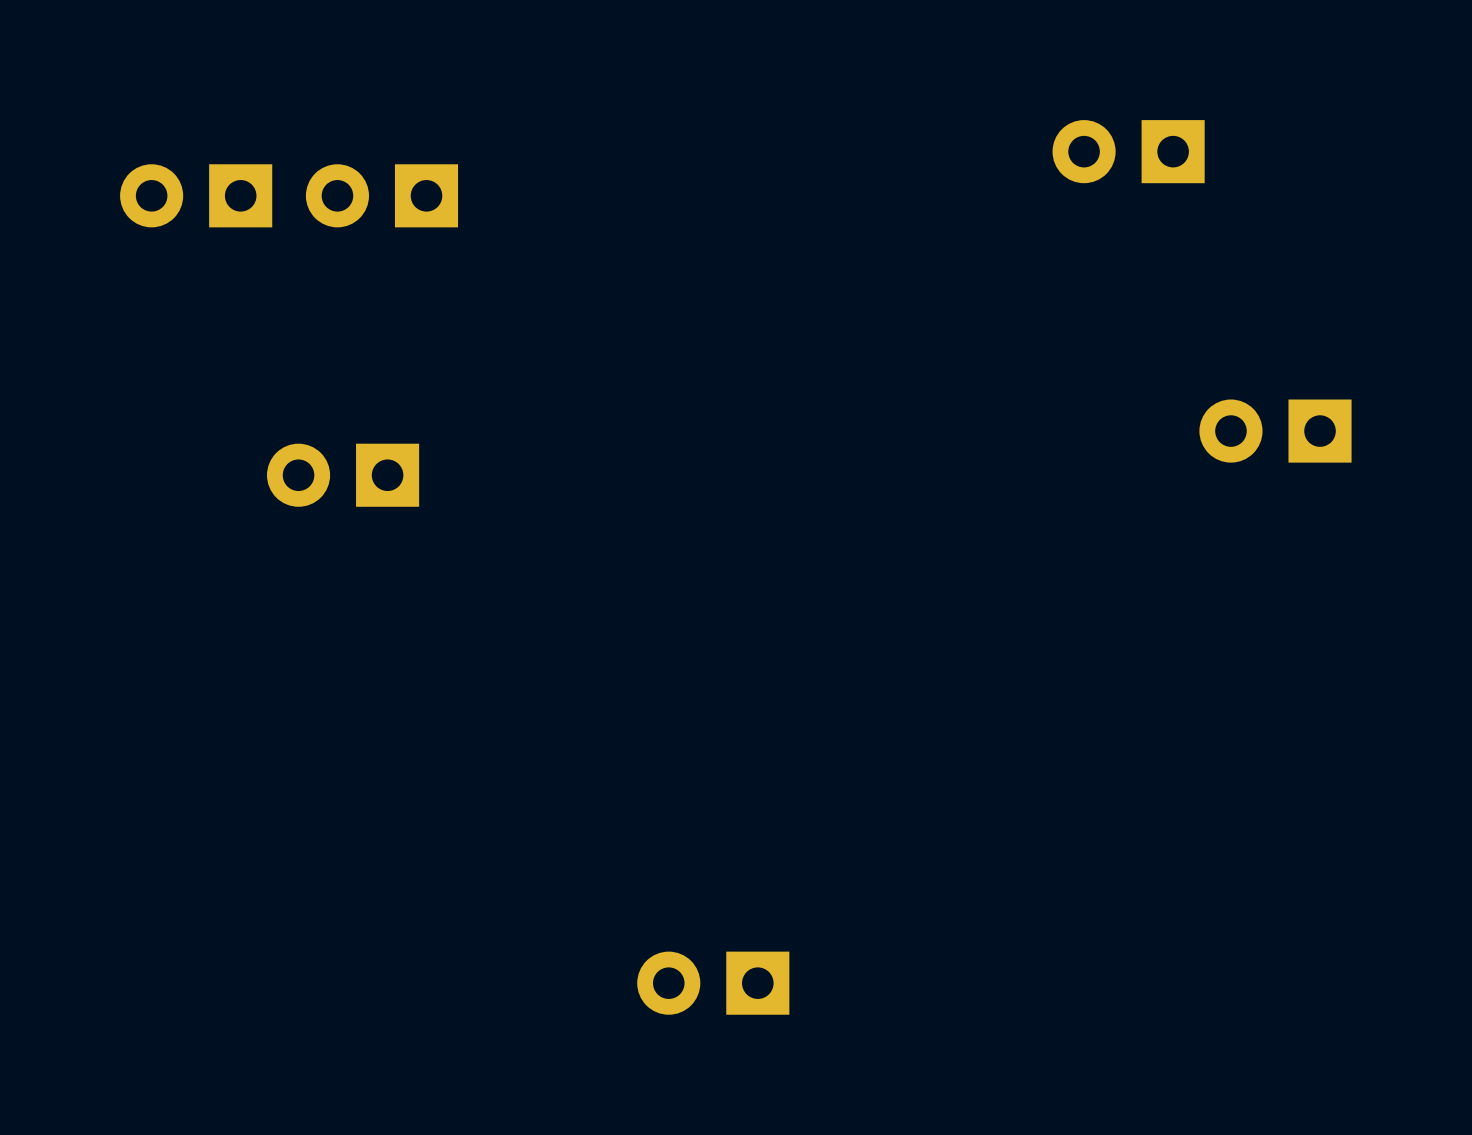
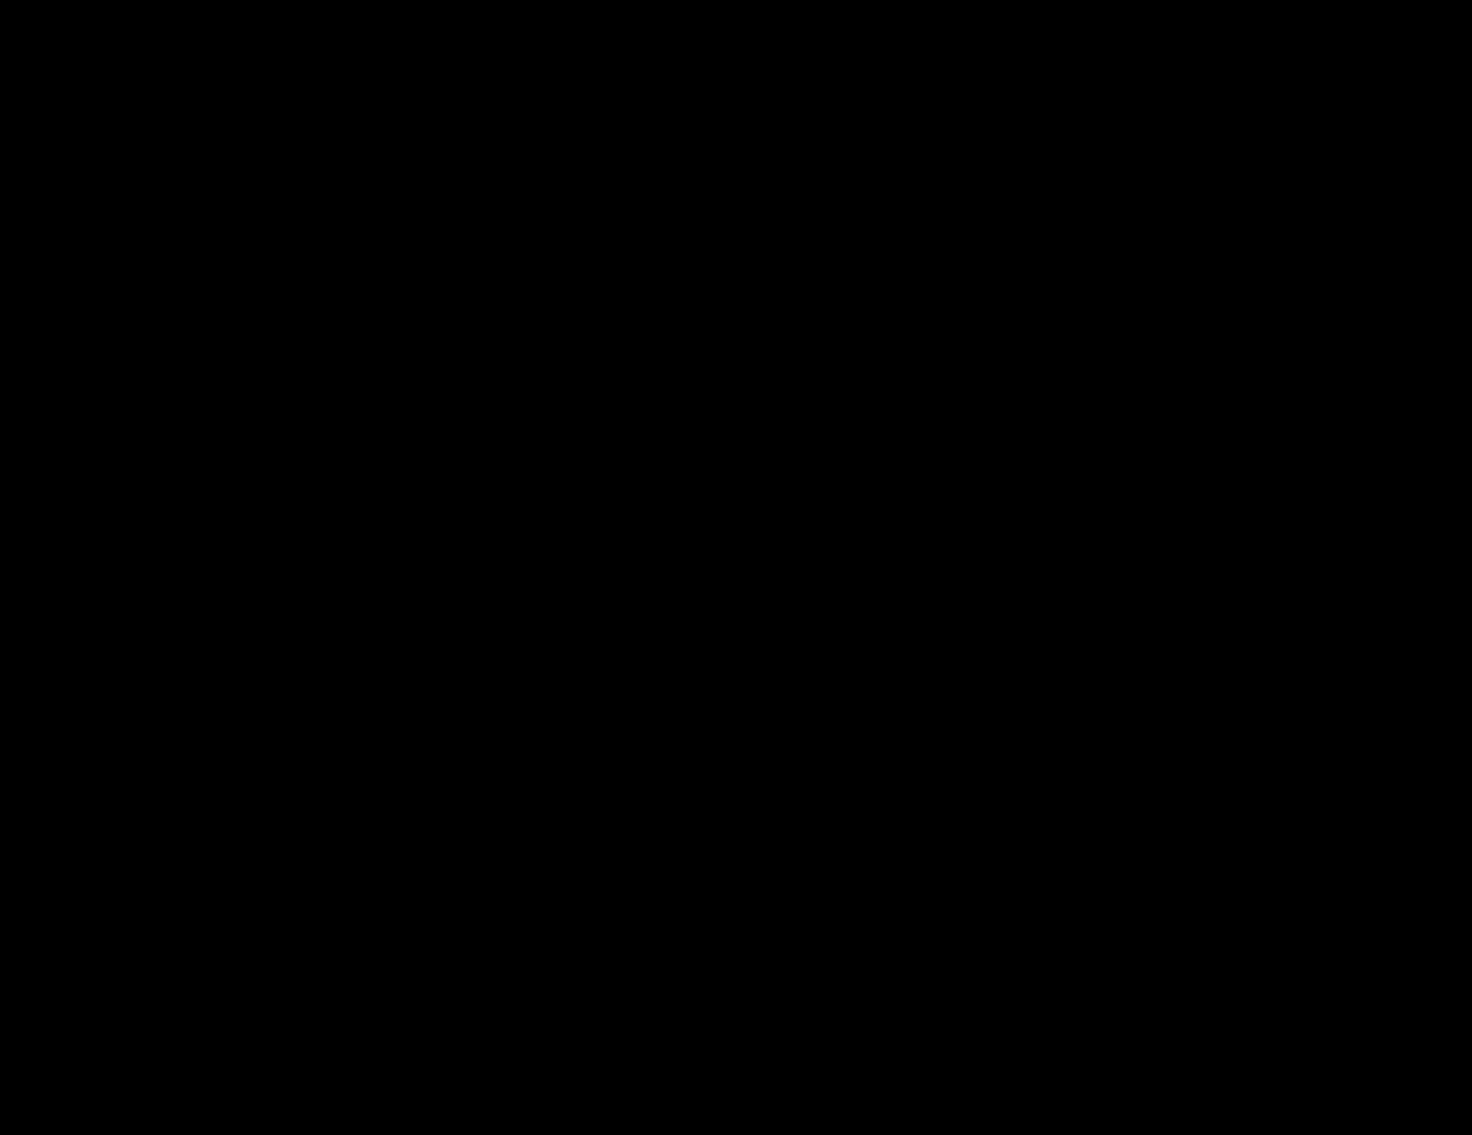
part: (1128, 151) -> none
part: (196, 195) -> none
part: (381, 195) -> none
part: (1275, 431) -> none
part: (343, 475) -> none
part: (713, 983) -> none

